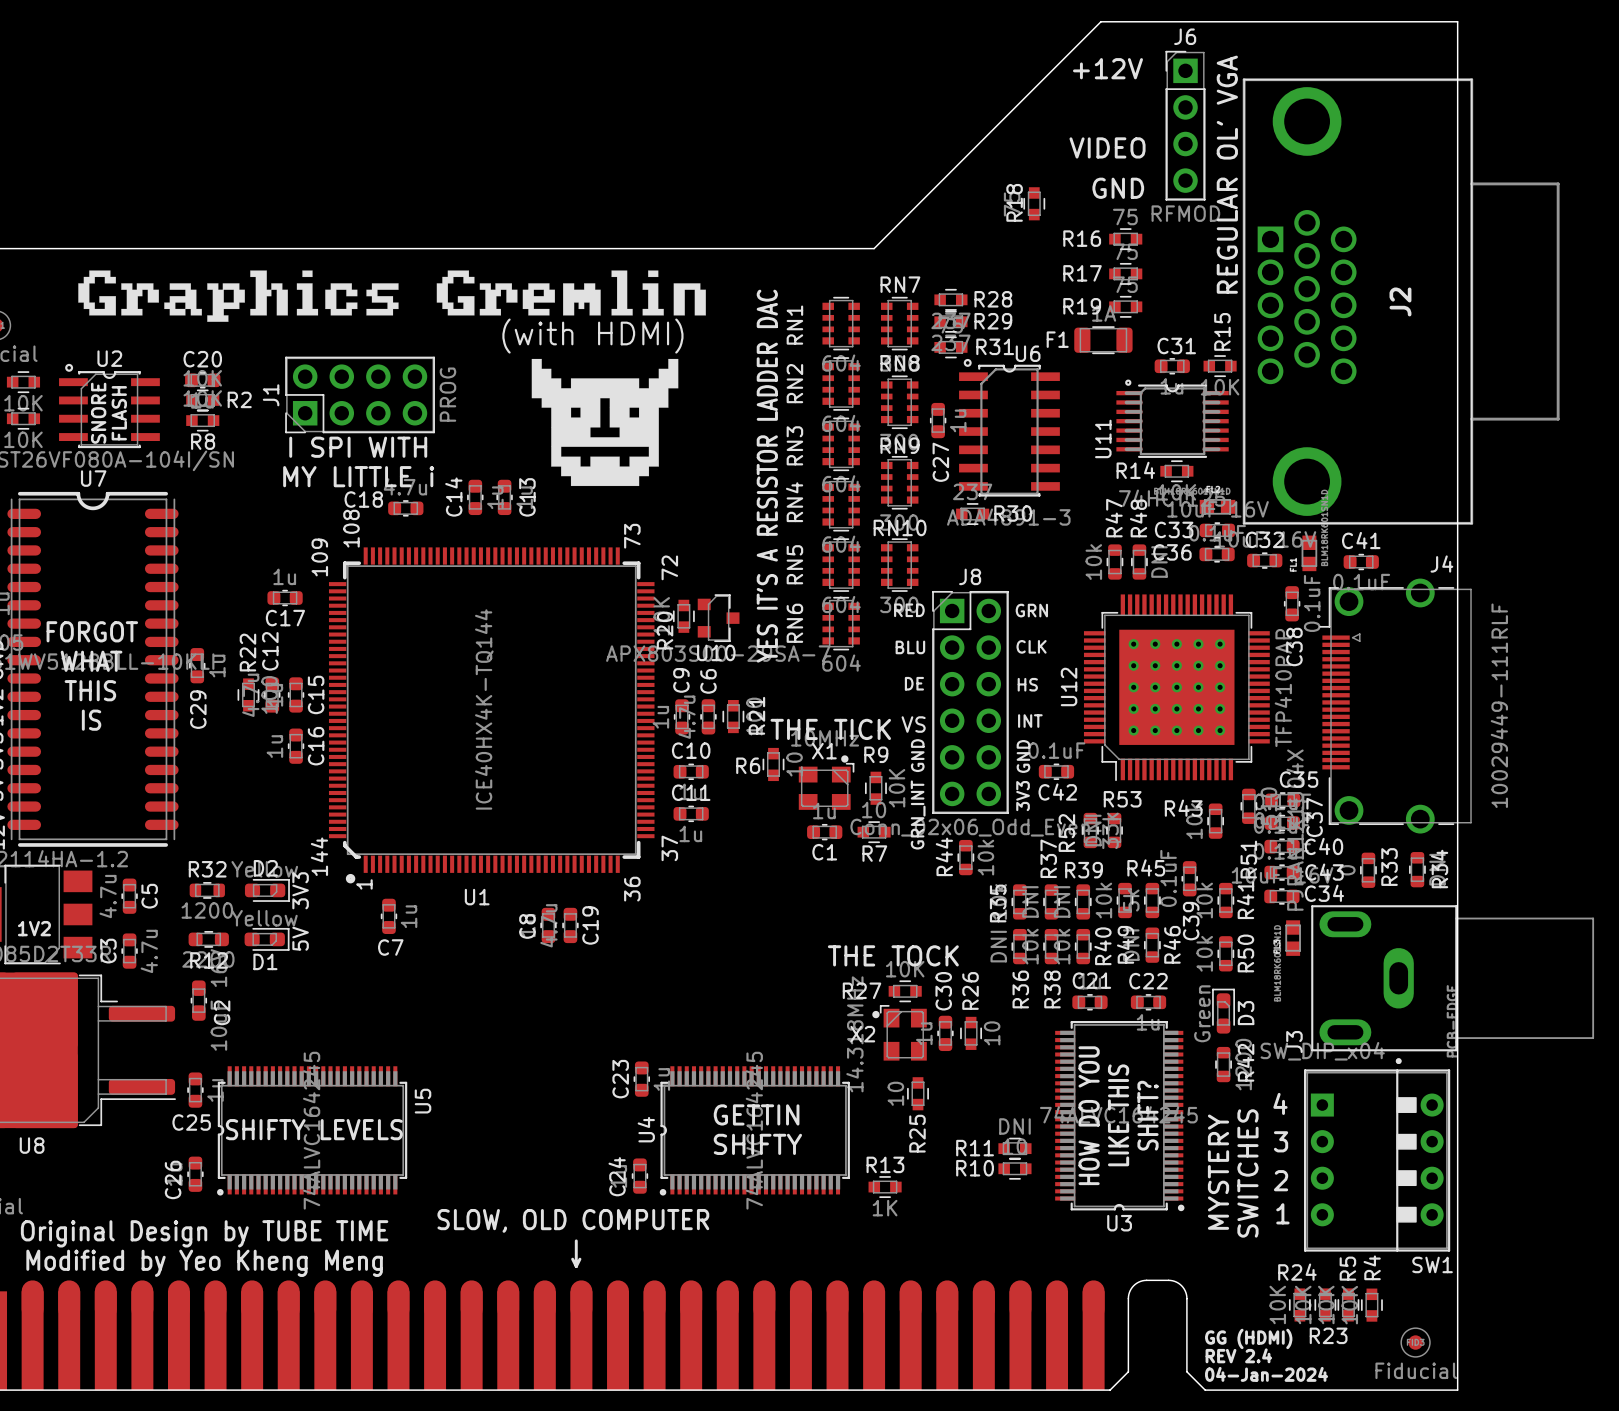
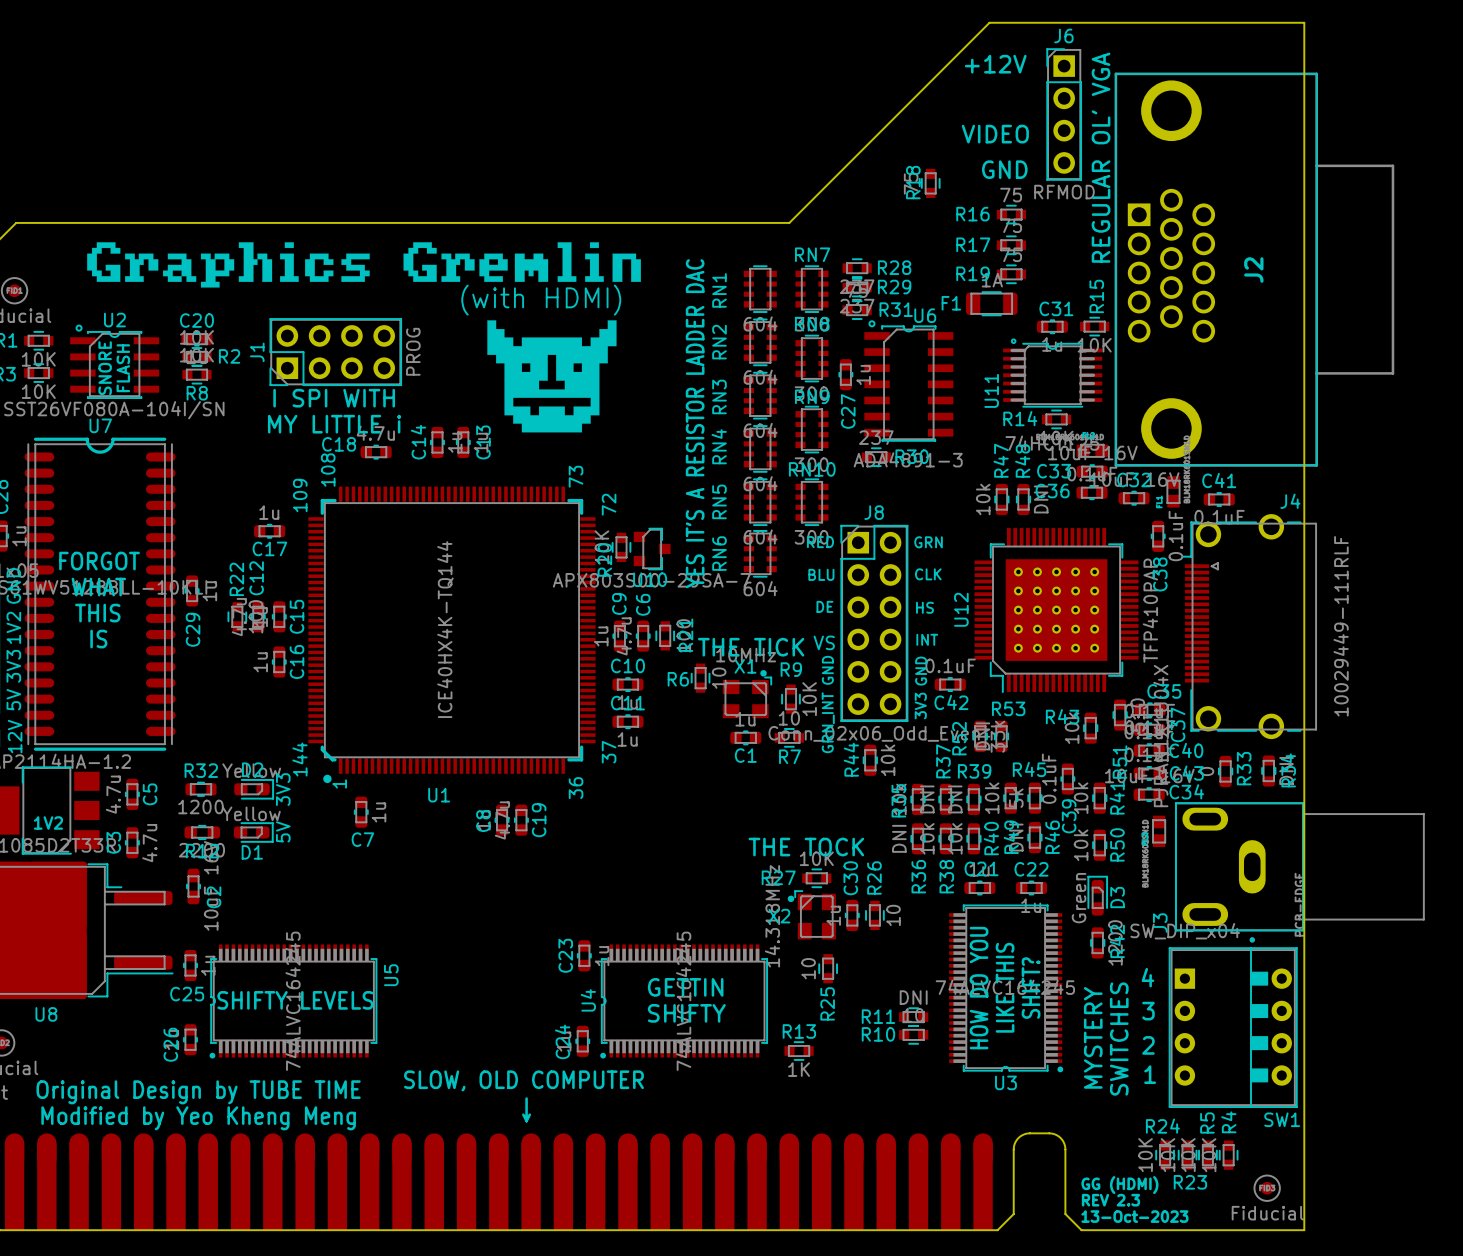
text: REV 2.4 (1238, 1355) -> REV 2.3 (1110, 1200)
text: 04-Jan-2024 (1266, 1374) -> 13-Oct-2023 (1134, 1216)

